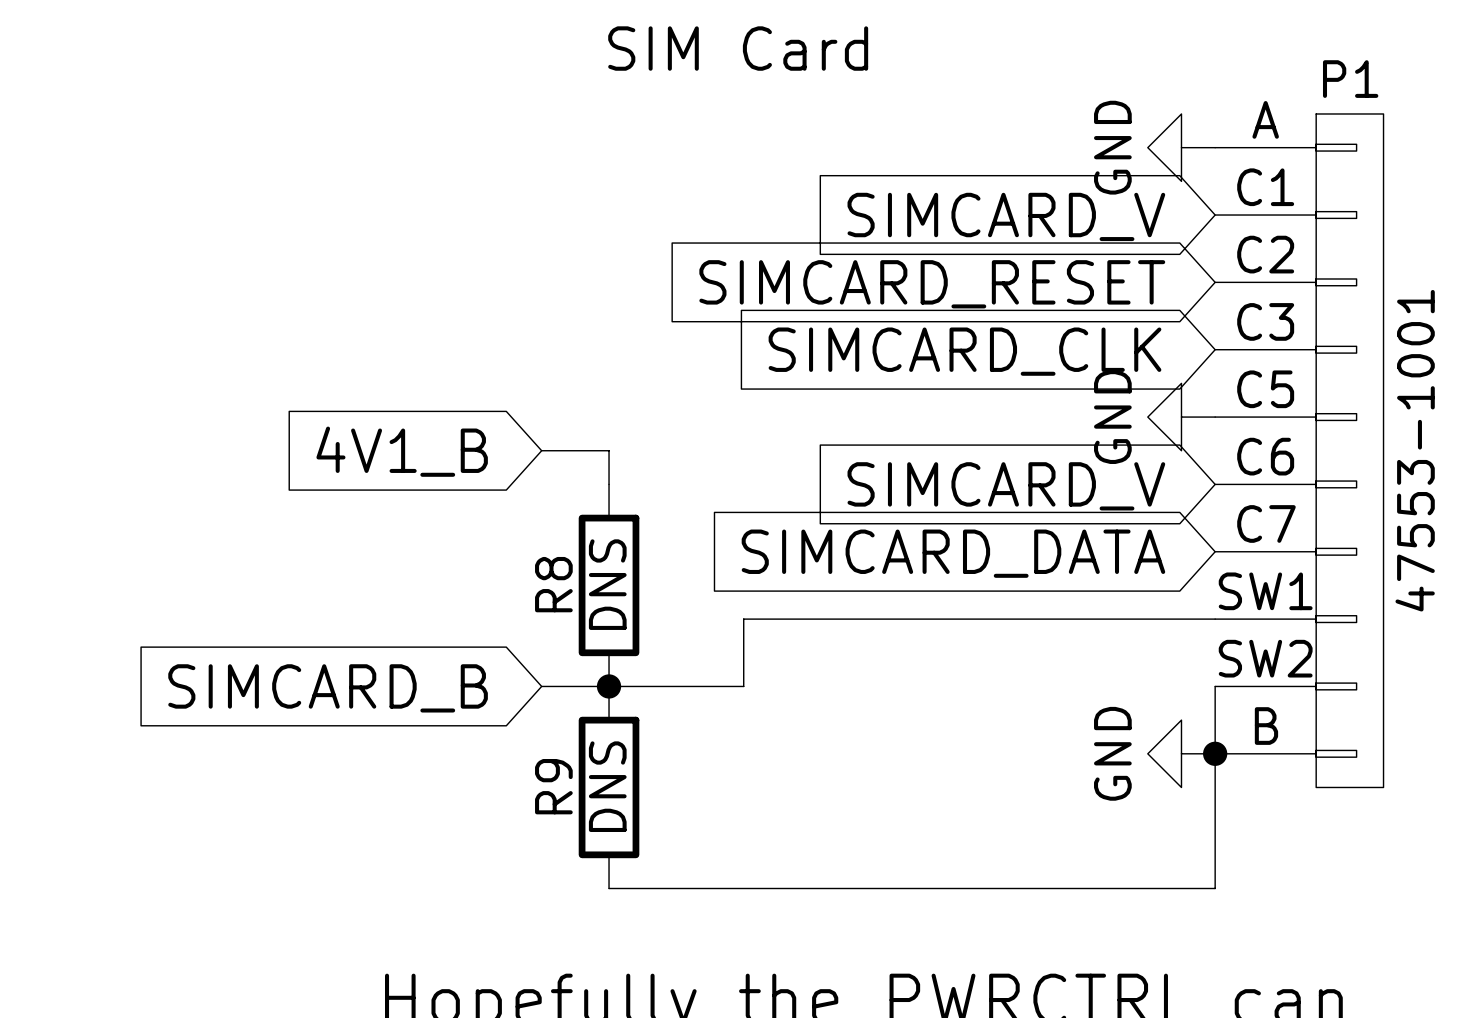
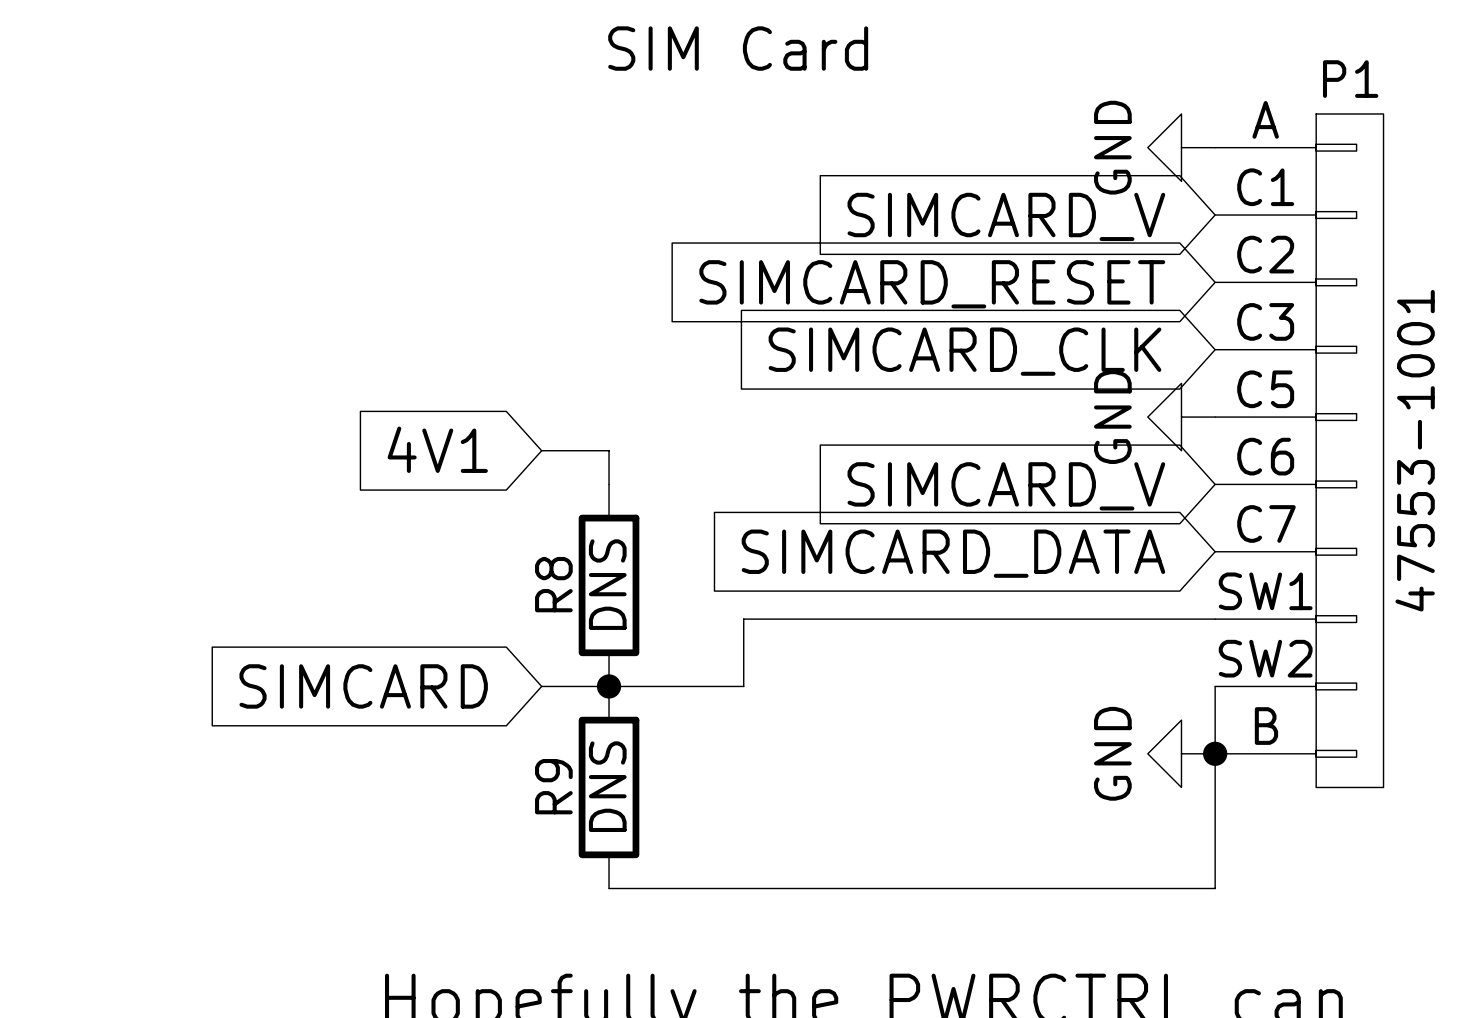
global label: 4V1_B (402, 451) -> 4V1 (437, 449)
global label: SIMCARD_B (328, 688) -> SIMCARD (363, 686)

